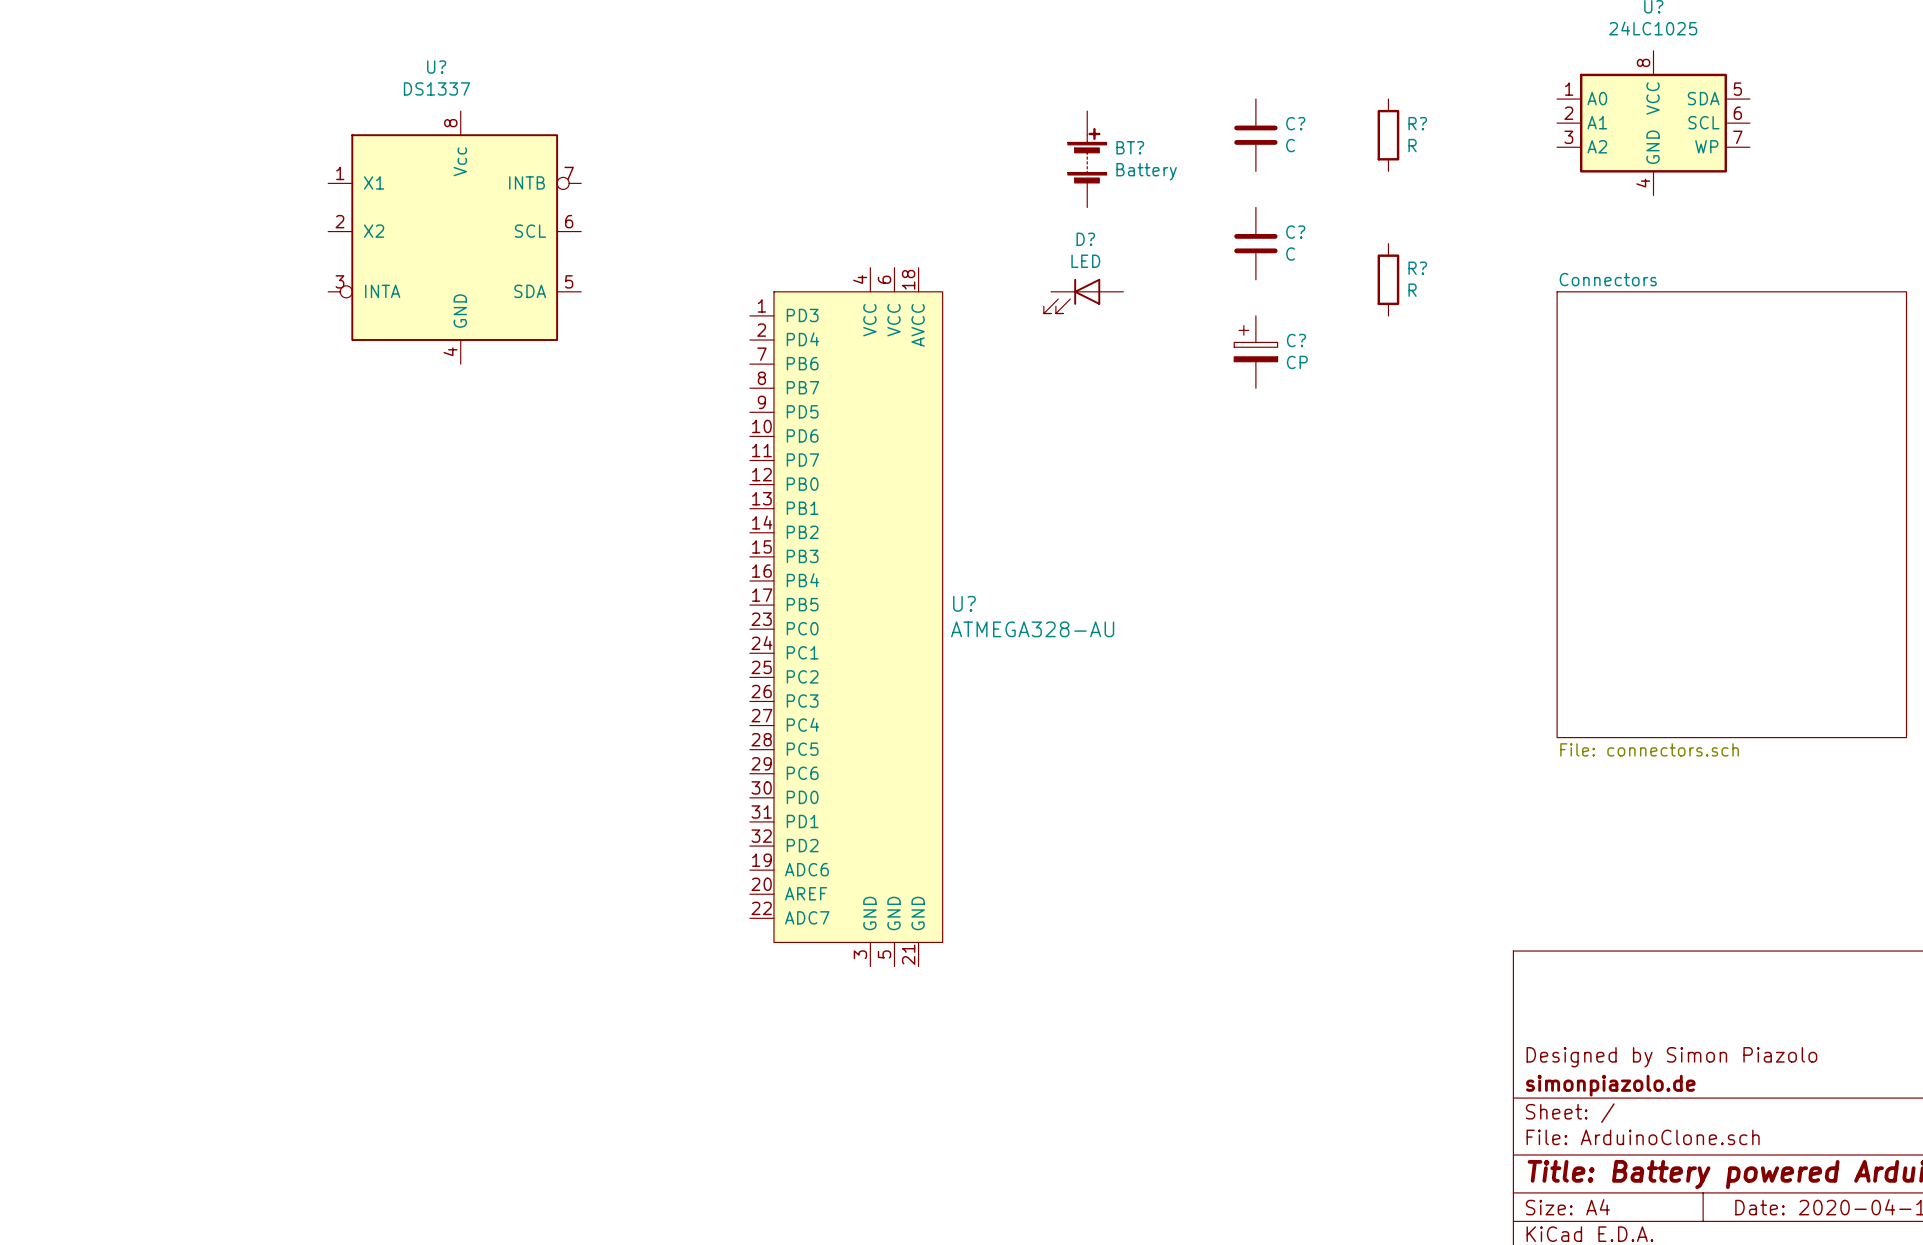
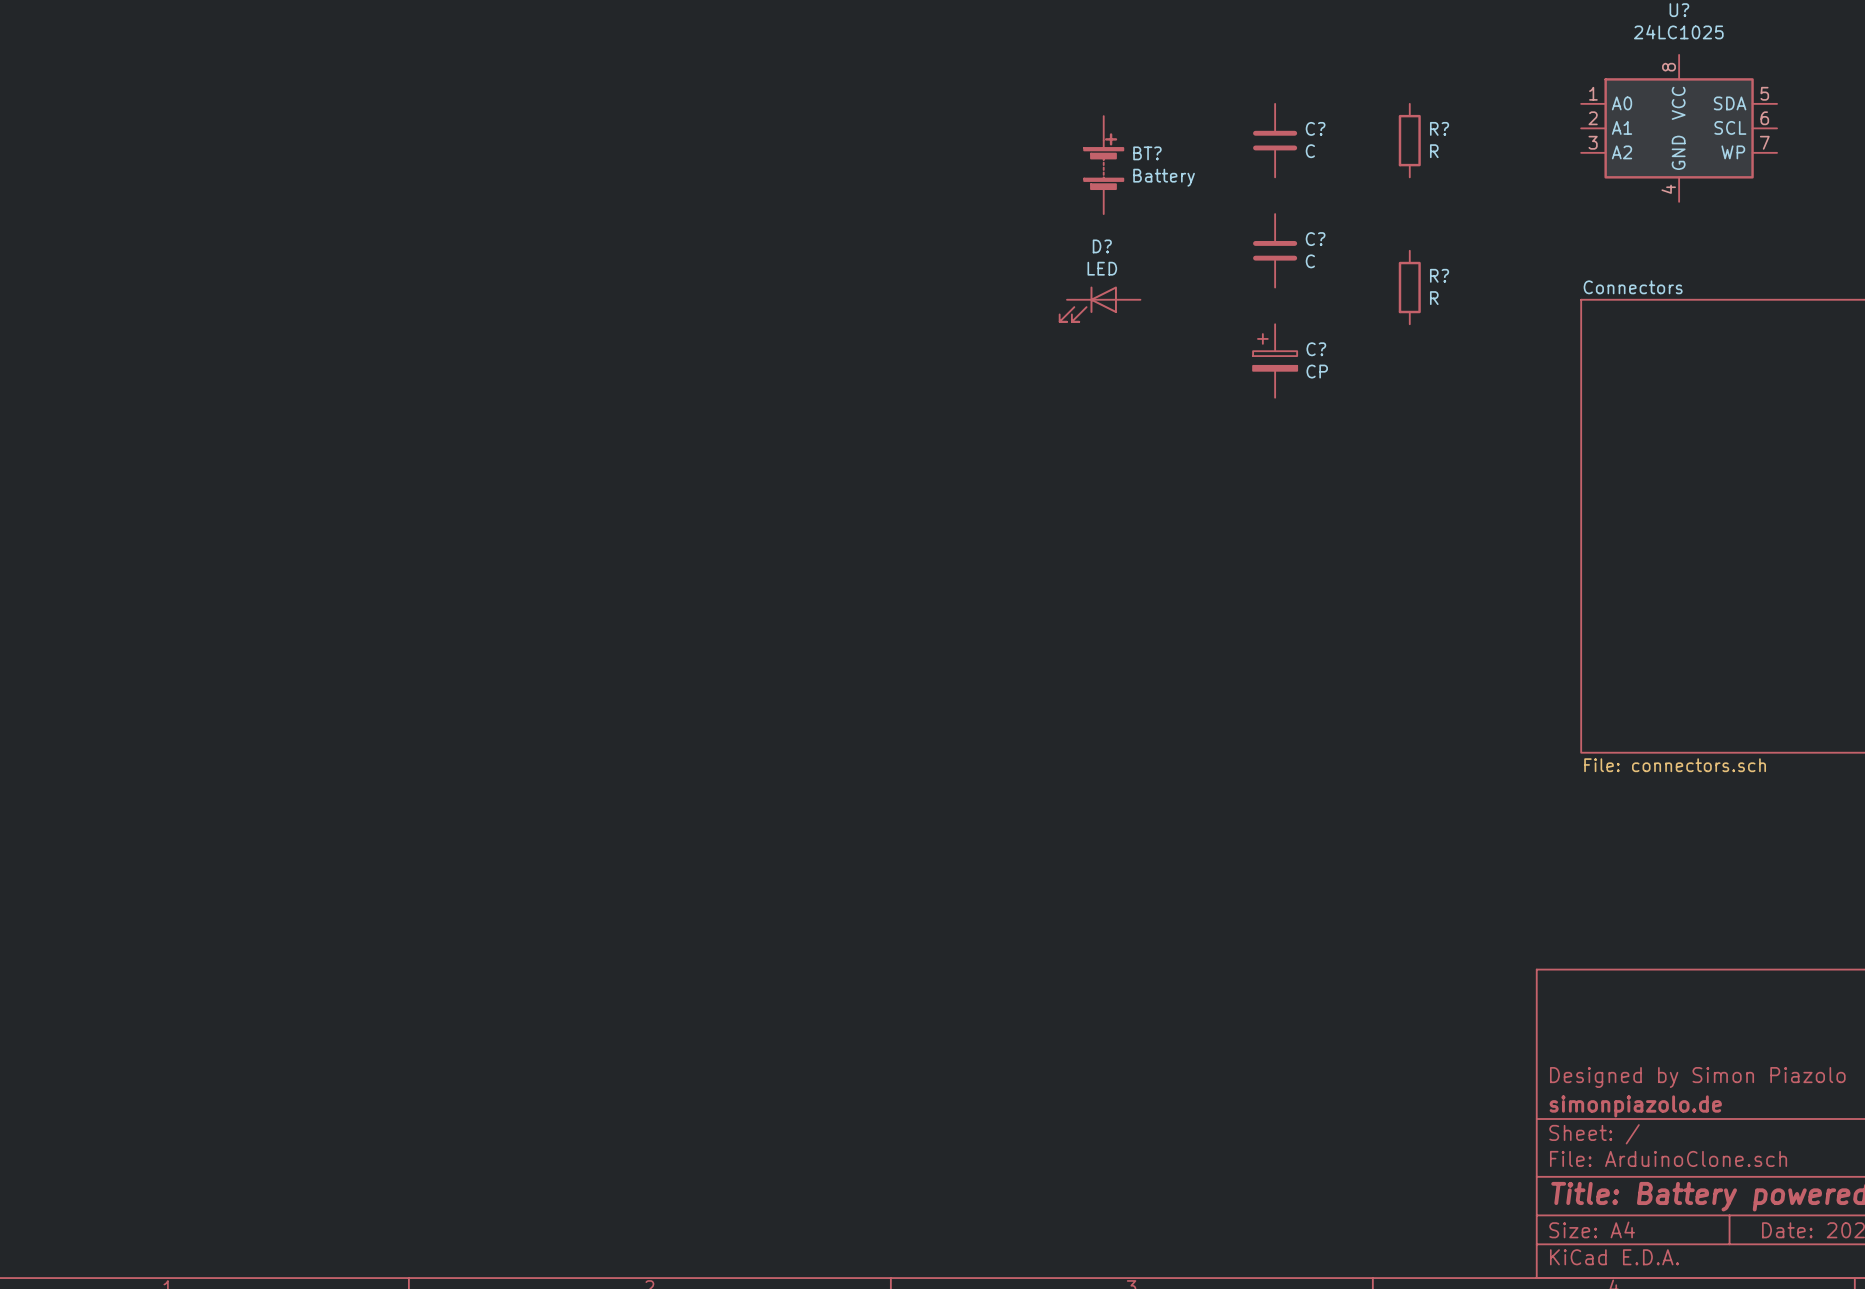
U?: DS1337 (434, 237) -> none
U?: ATMEGA328-AU (846, 617) -> none

